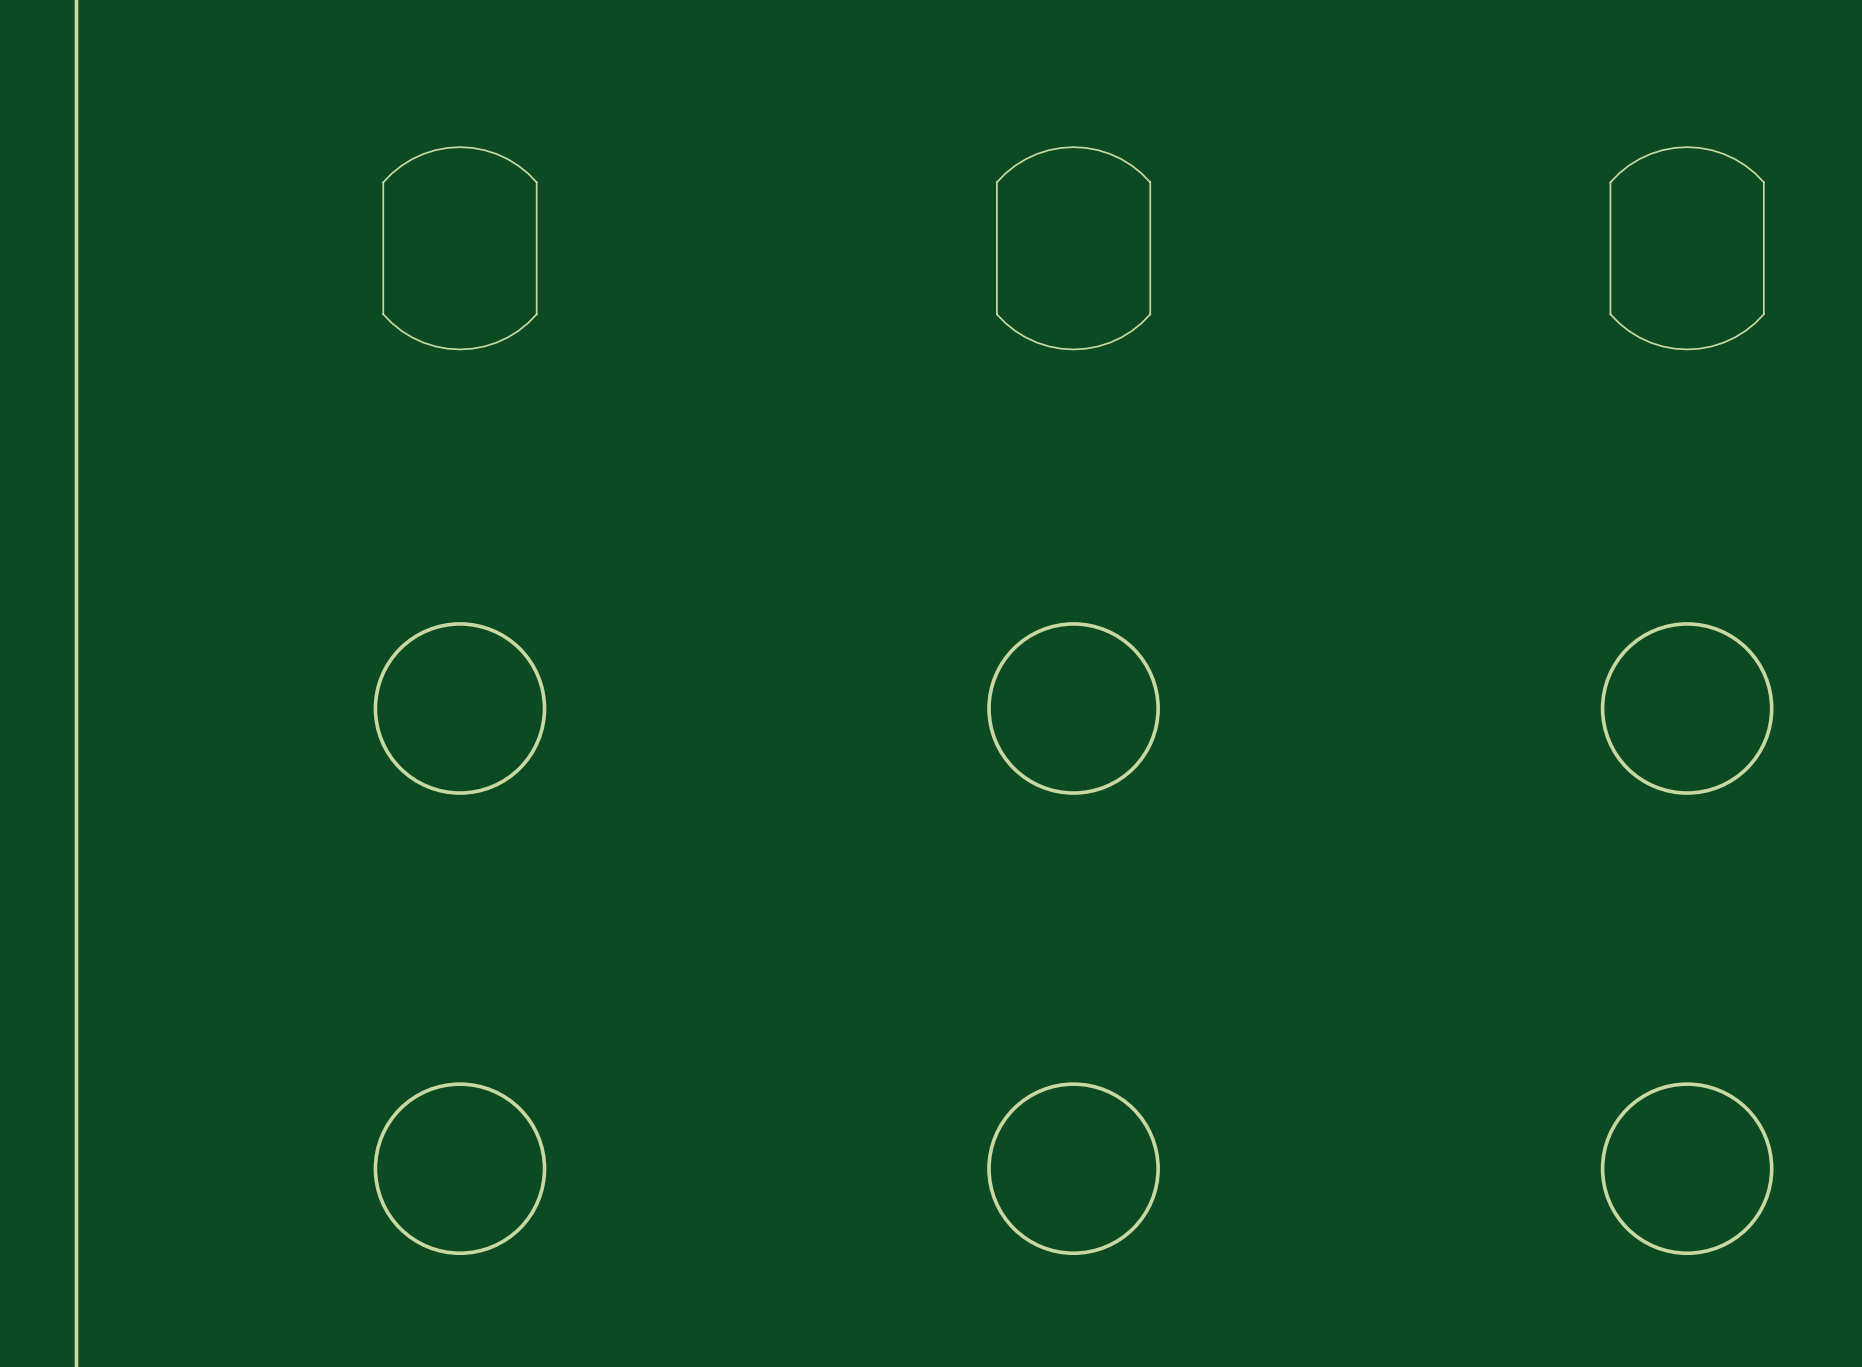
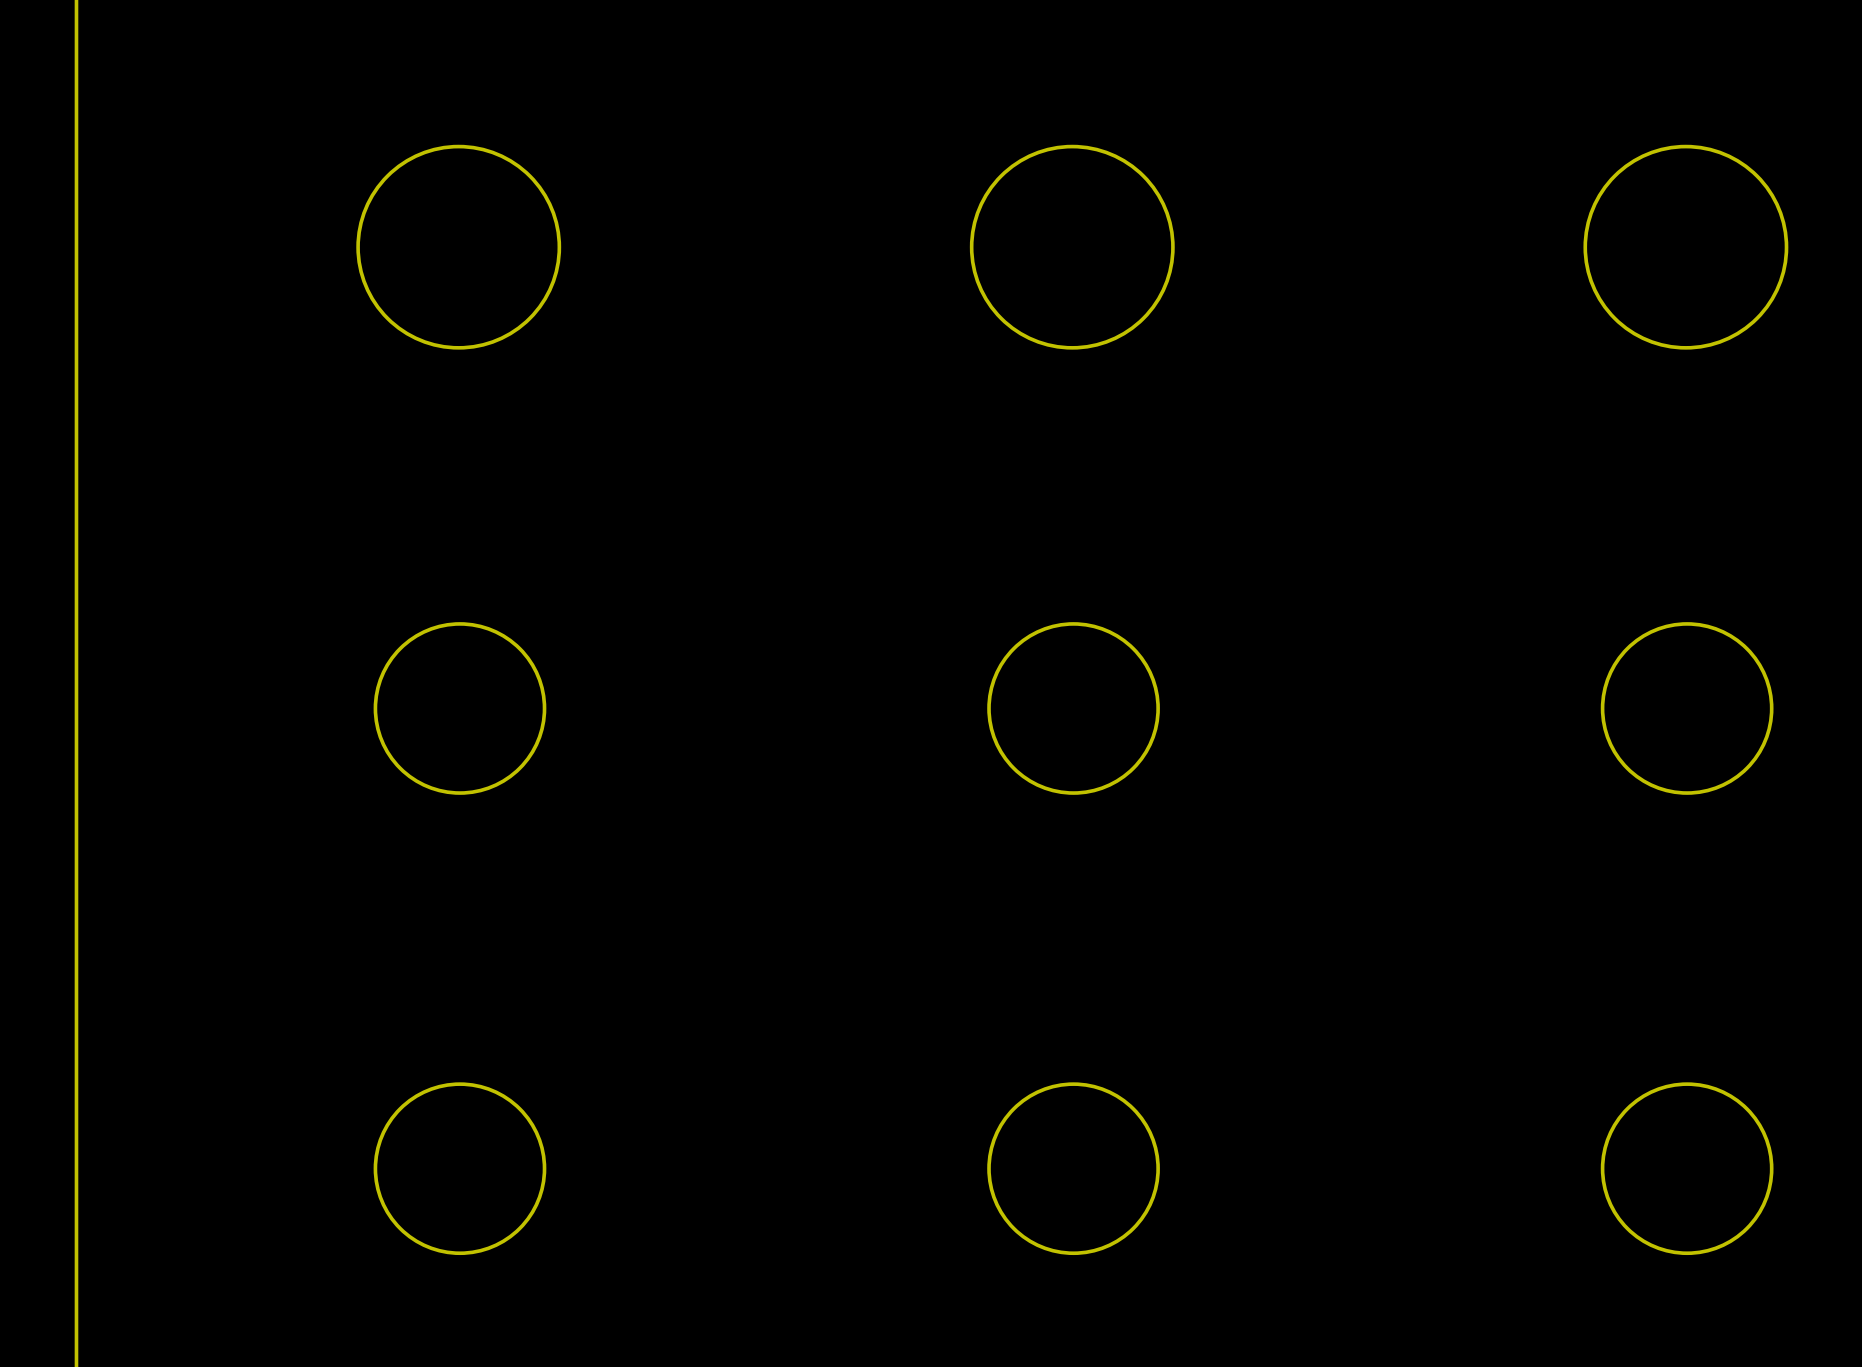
drawing shape: [382, 146, 537, 350] -> [356, 144, 562, 350]
drawing shape: [996, 146, 1151, 350] -> [969, 144, 1175, 350]
drawing shape: [1610, 146, 1765, 350] -> [1583, 144, 1789, 350]

